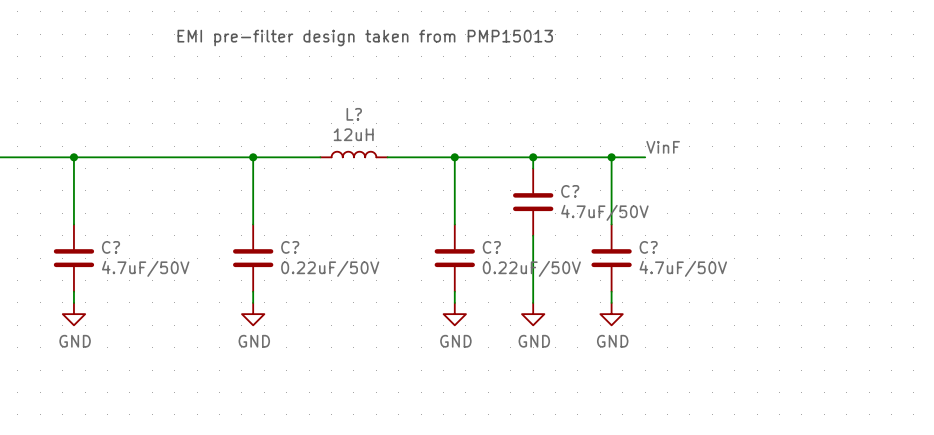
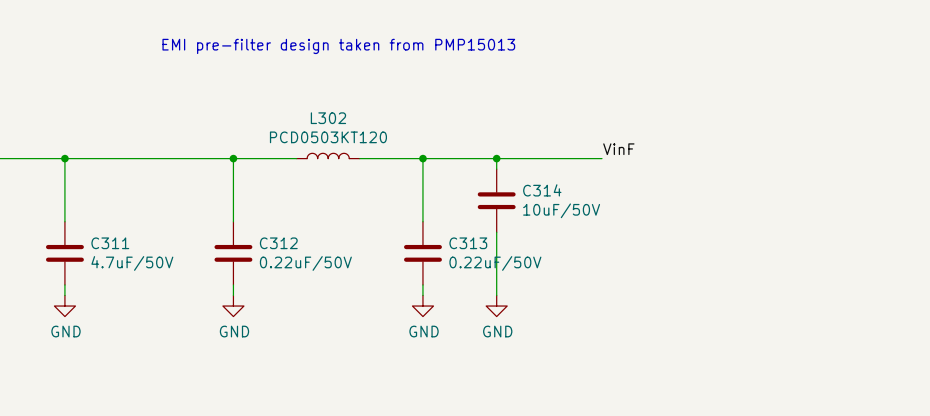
L? name: L? (354, 114) -> L302 (328, 118)
L? value: 12uH (353, 134) -> PCD0503KT120 (328, 137)
wire: (611, 157) (611, 224) -> none
junction: (611, 157) -> none
C? name: C? (570, 191) -> C314 (542, 190)
C? value: 4.7uF/50V (604, 212) -> 10uF/50V (561, 210)
C? name: C? (111, 247) -> C311 (110, 243)
C? name: C? (290, 247) -> C312 (278, 243)
C? name: C? (491, 247) -> C313 (468, 243)
C?: 4.7uF/50V (611, 258) -> none
wire: (611, 291) (611, 302) -> none
power symbol: GND (611, 314) -> none

